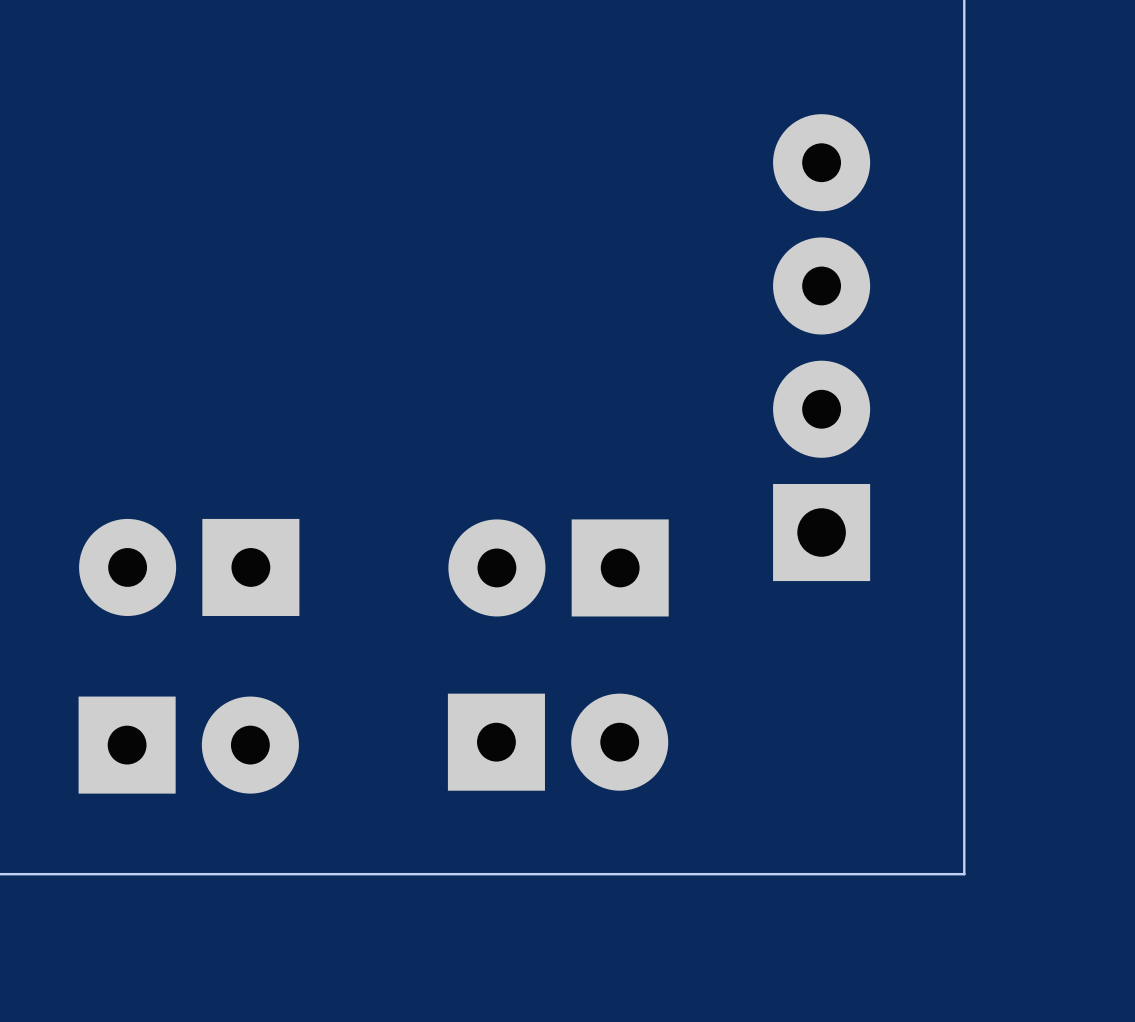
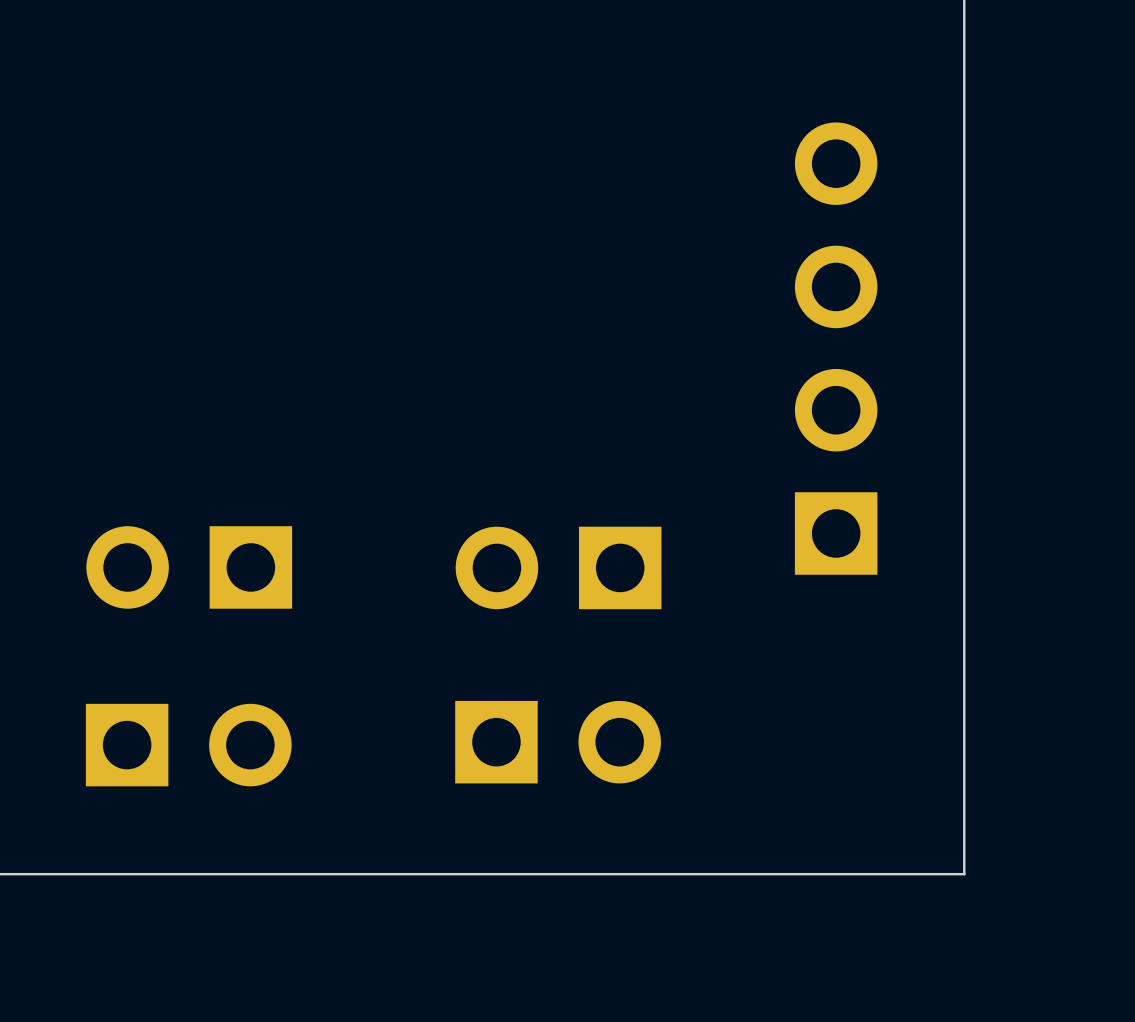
part footprint: [773, 114, 871, 582] -> [794, 122, 878, 575]
part footprint: [79, 518, 300, 616] -> [86, 526, 293, 609]
part footprint: [448, 519, 669, 617] -> [455, 526, 662, 610]
part footprint: [447, 693, 669, 791] -> [455, 700, 661, 784]
part footprint: [78, 696, 299, 794] -> [85, 703, 292, 787]

